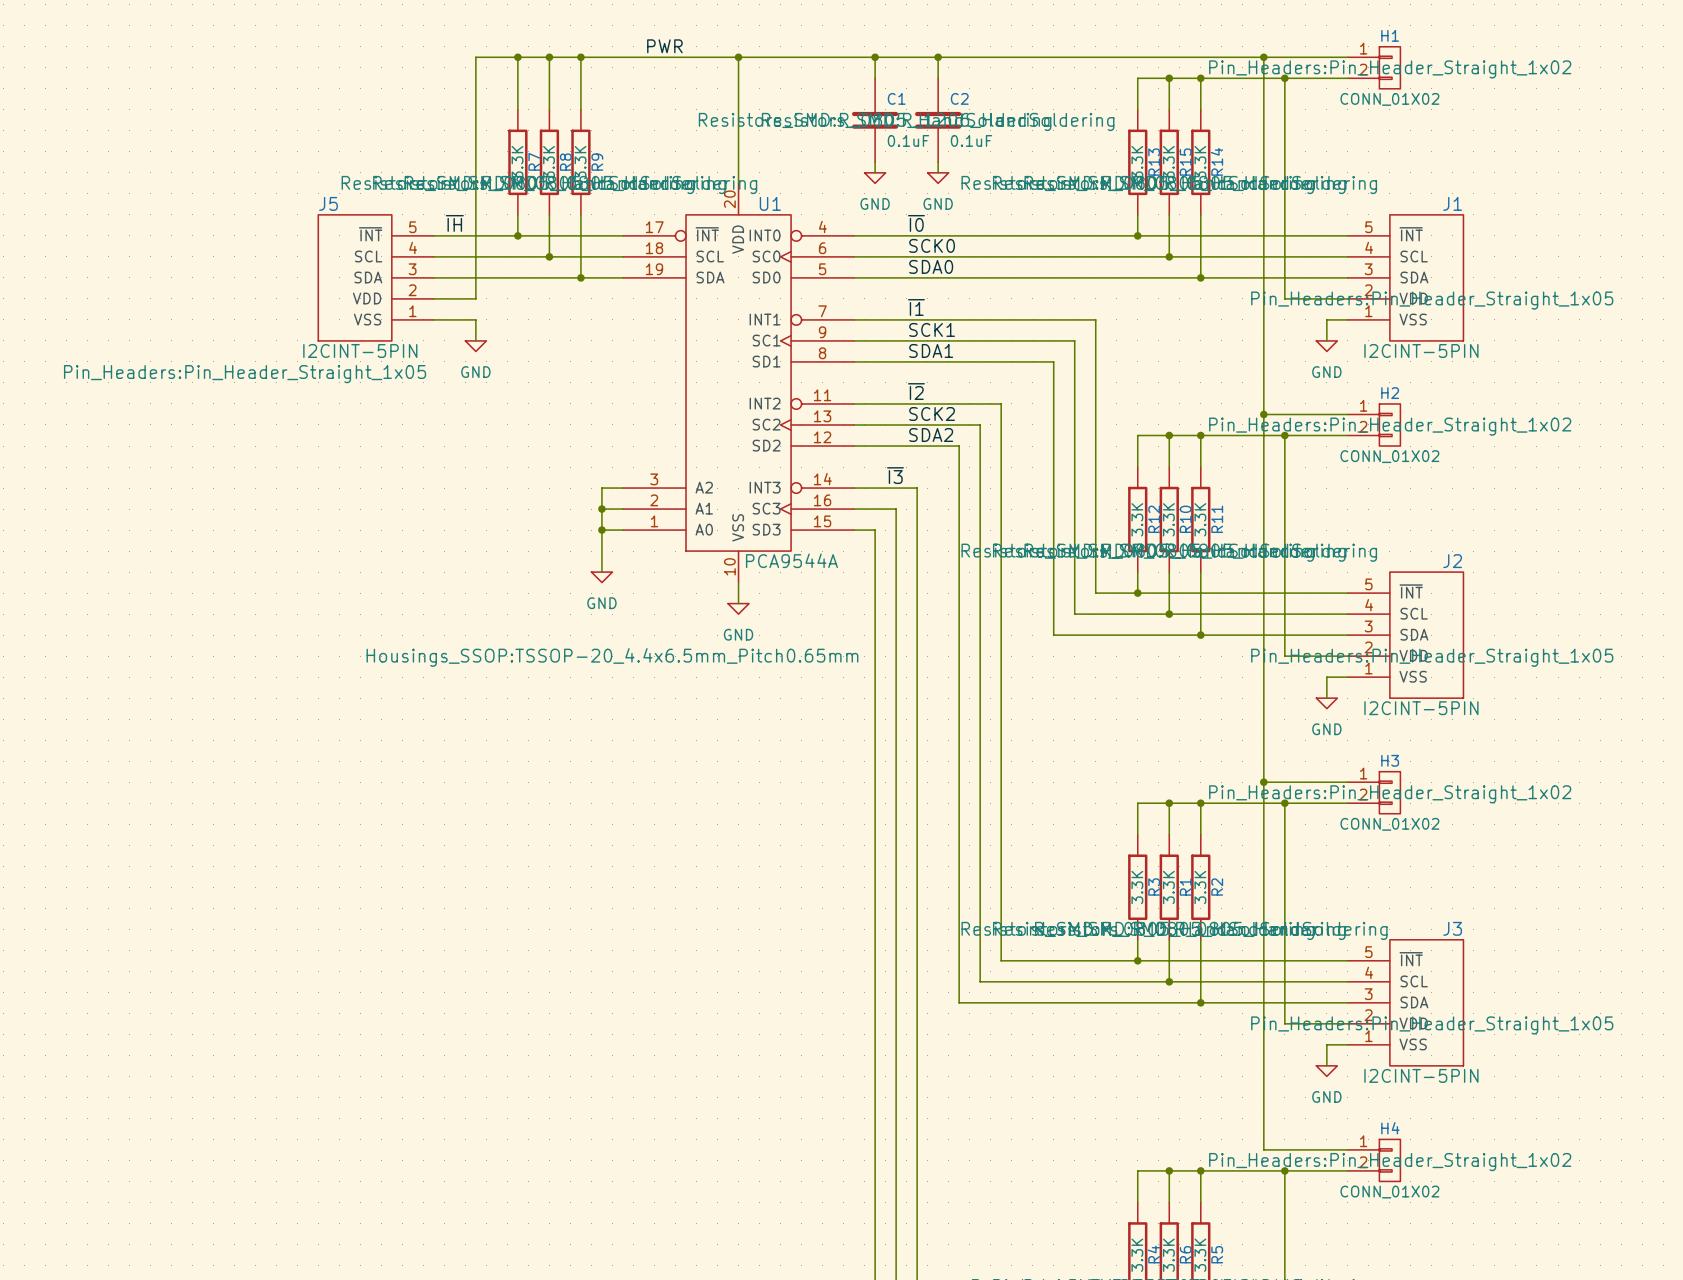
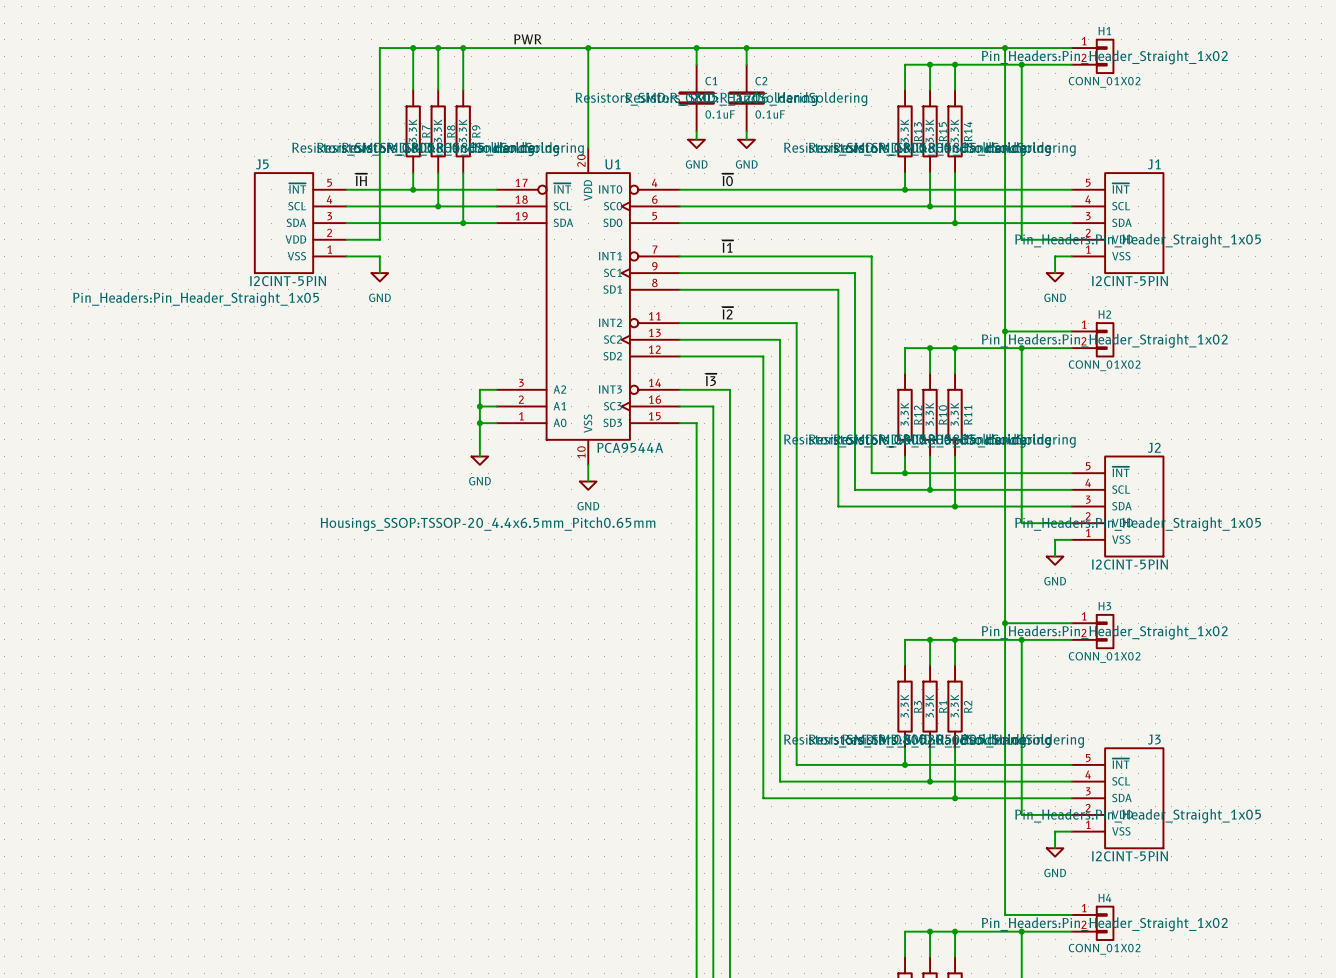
label: SCK0 (932, 245) -> none
label: SDA0 (931, 266) -> none
label: SCK1 (932, 329) -> none
label: SDA1 (931, 350) -> none
label: SCK2 (932, 414) -> none
label: SDA2 (931, 435) -> none

